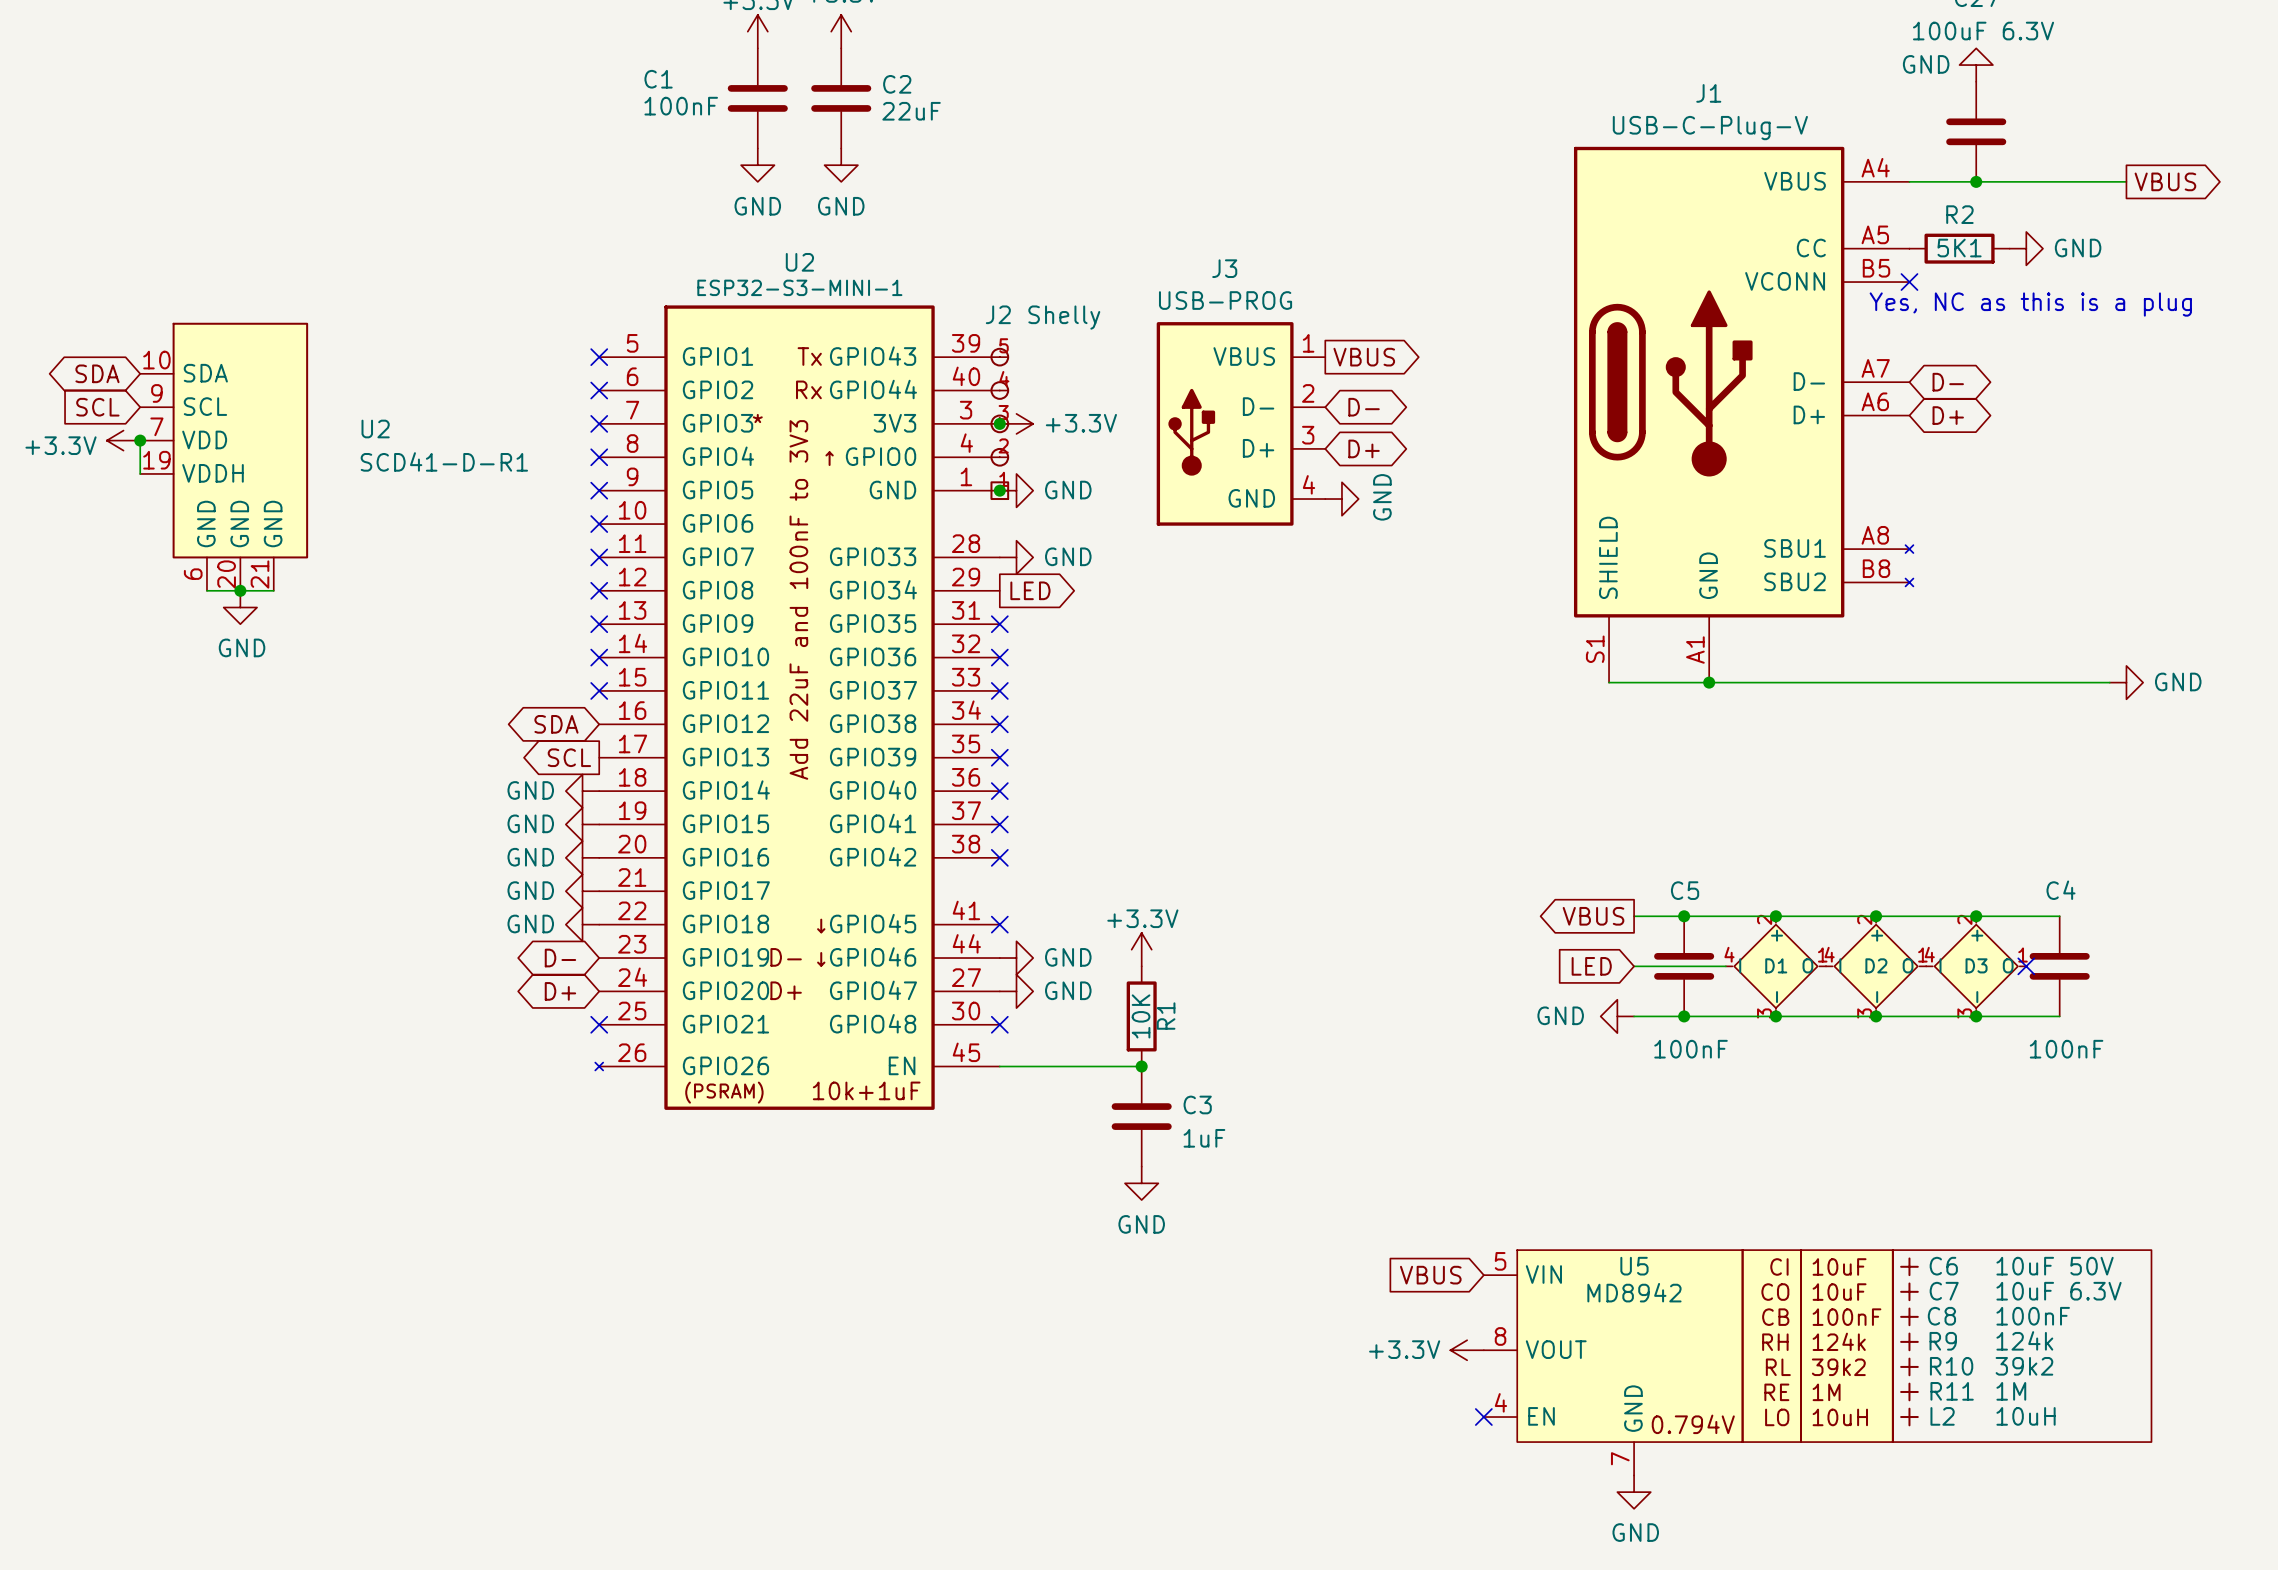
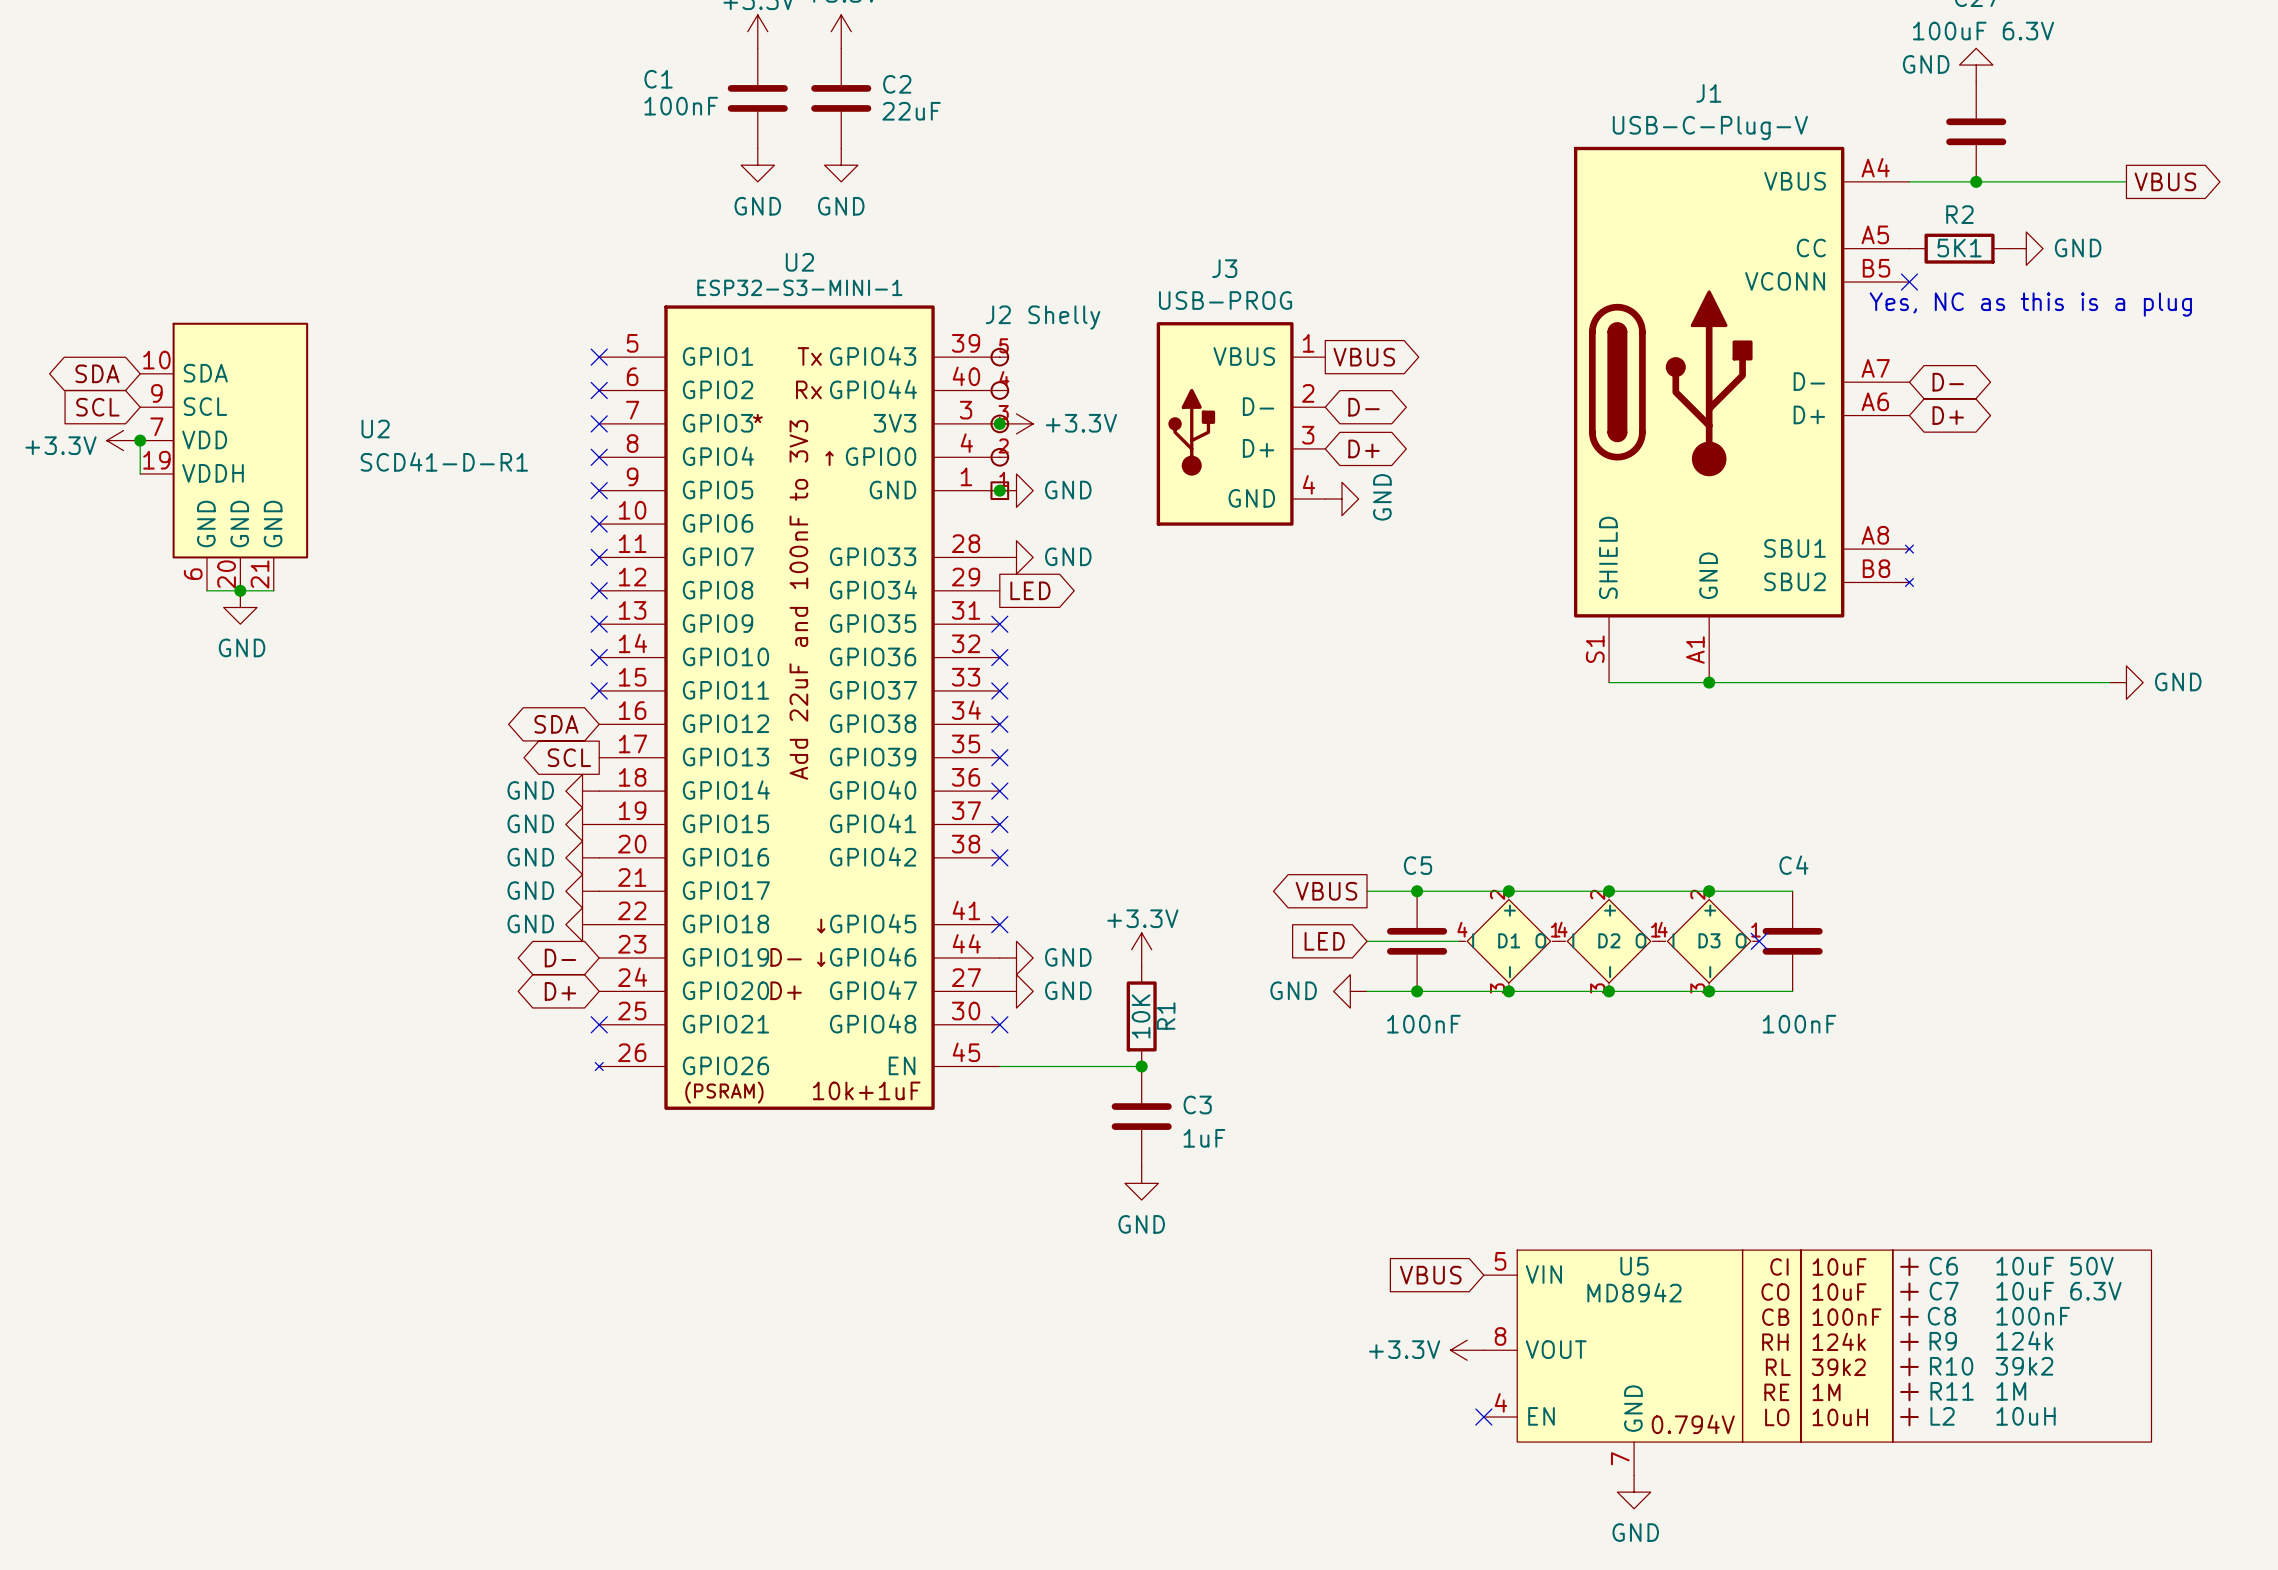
junction: none -> (1417, 891)
junction: none -> (1508, 891)
junction: none -> (1609, 891)
global label position: VBUS (1593, 916) -> VBUS (1326, 891)
wire: (1634, 916) (2059, 916) -> (1367, 891) (1792, 891)
junction position: (1684, 916) -> (1709, 891)
junction: (1775, 916) -> none
junction: (1876, 916) -> none
junction: (1976, 916) -> none
no-connect mark: none -> (1759, 941)
global label position: LED (1591, 966) -> LED (1324, 941)
wire: (1634, 966) (1725, 966) -> (1367, 941) (1458, 941)
C5 position: (1684, 966) -> (1417, 941)
D1 position: (1775, 966) -> (1508, 941)
D2 position: (1876, 966) -> (1609, 941)
D3 position: (1976, 966) -> (1709, 941)
no-connect mark: (2026, 966) -> none
C4 position: (2059, 966) -> (1792, 941)
junction: none -> (1417, 991)
junction: none -> (1508, 991)
junction: none -> (1609, 991)
power symbol position: GND (1617, 1016) -> GND (1350, 991)
wire: (1634, 1016) (2059, 1016) -> (1367, 991) (1792, 991)
junction position: (1684, 1016) -> (1709, 991)
junction: (1775, 1016) -> none
junction: (1876, 1016) -> none
junction: (1976, 1016) -> none

